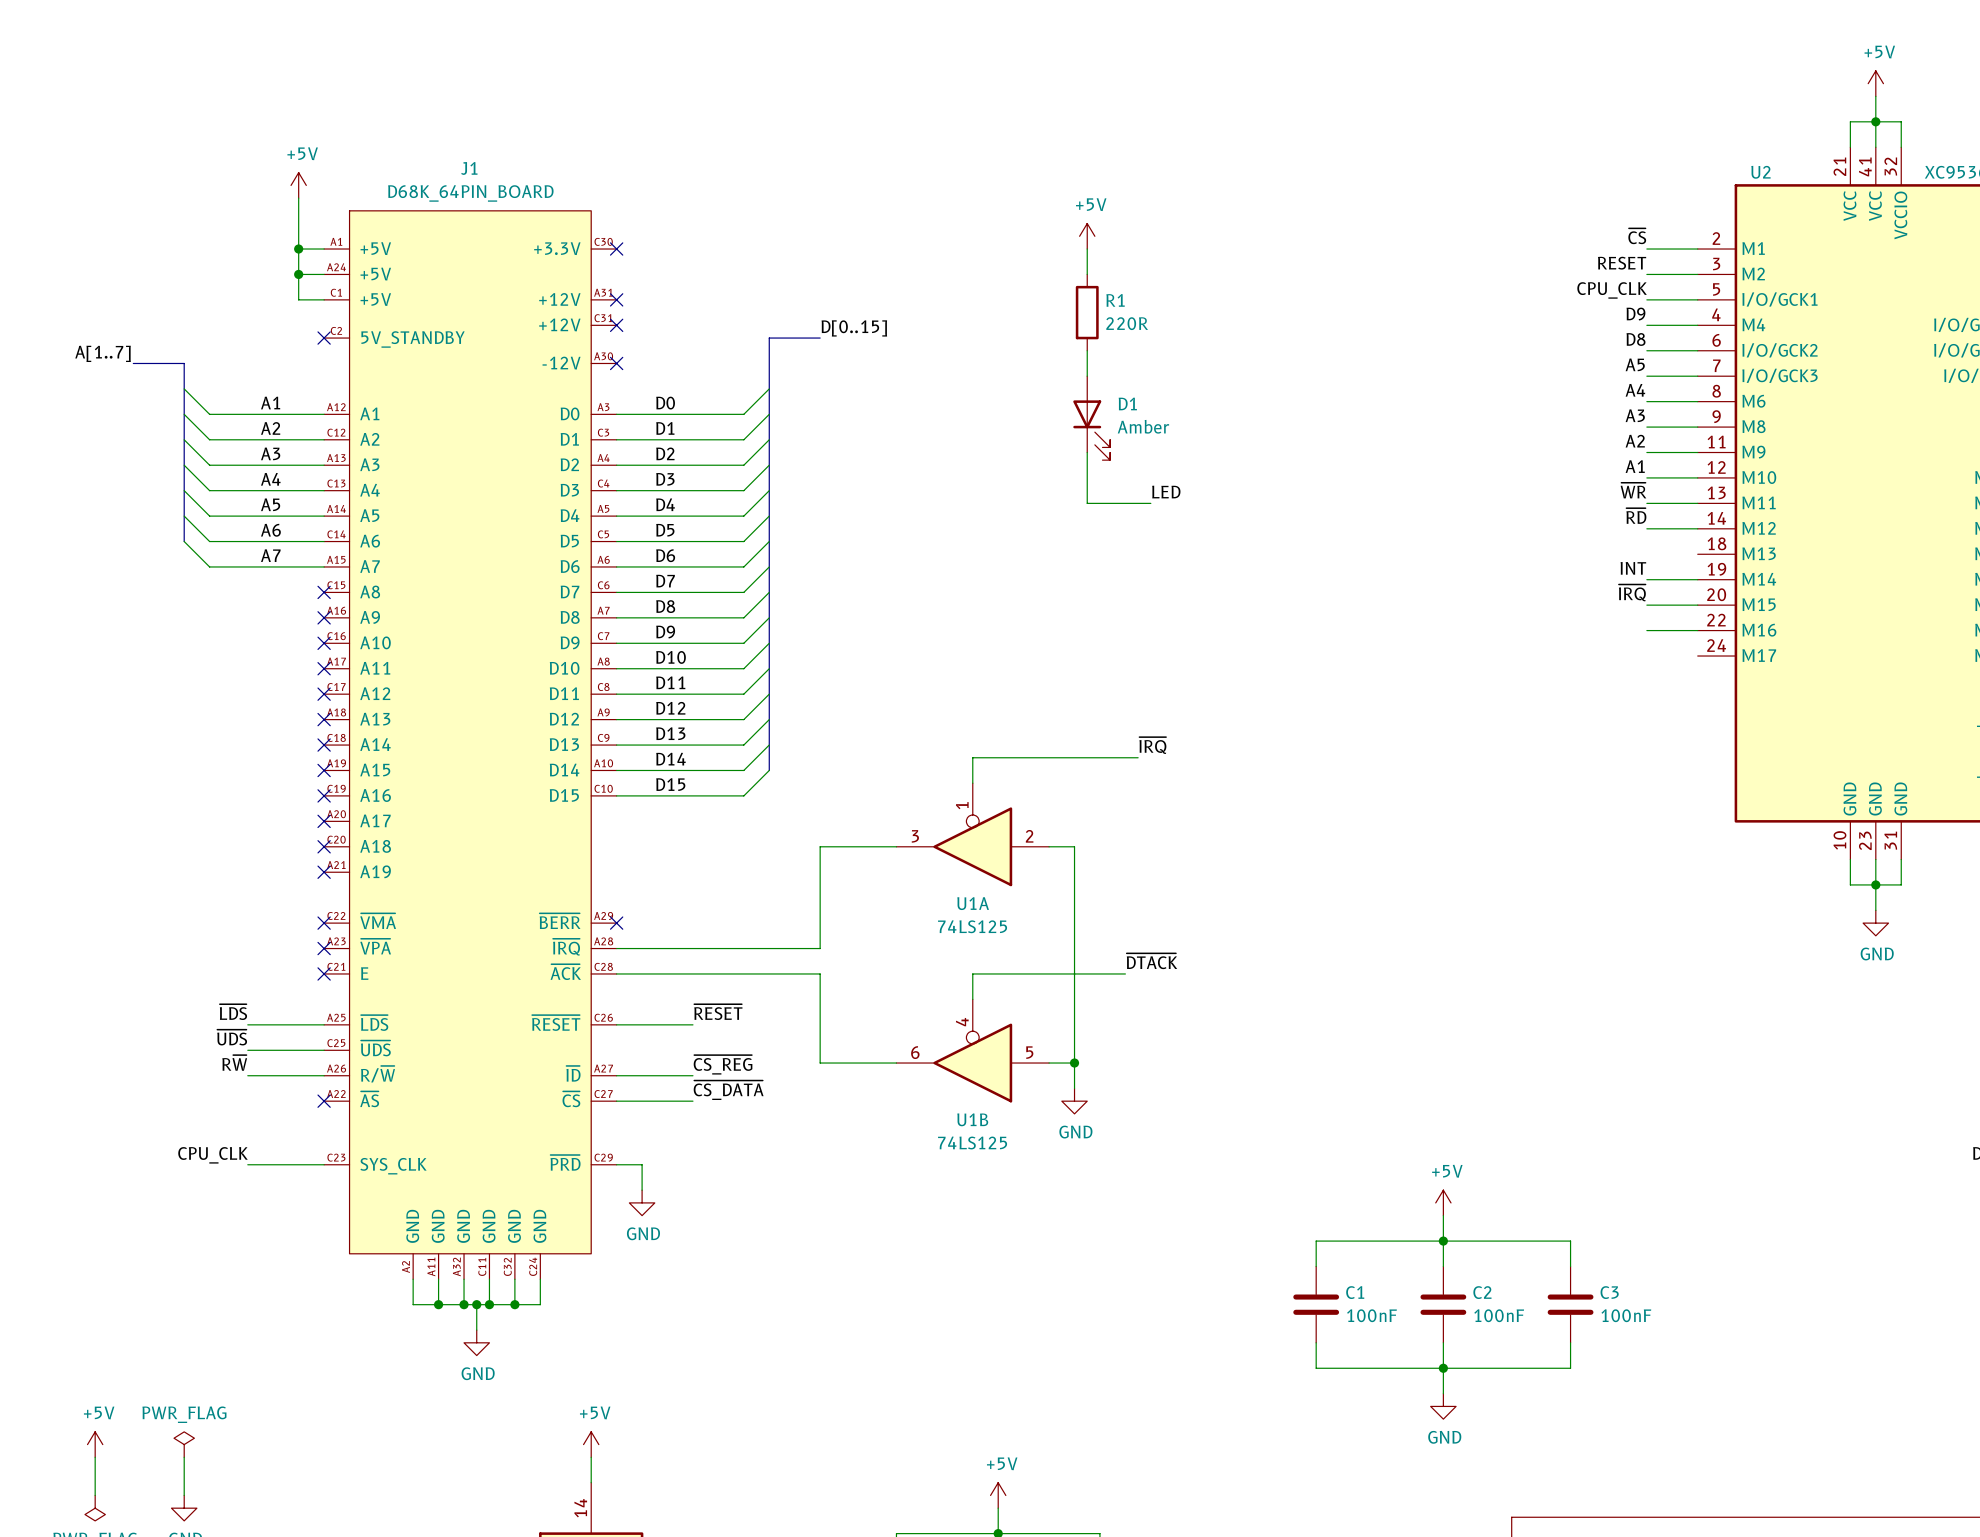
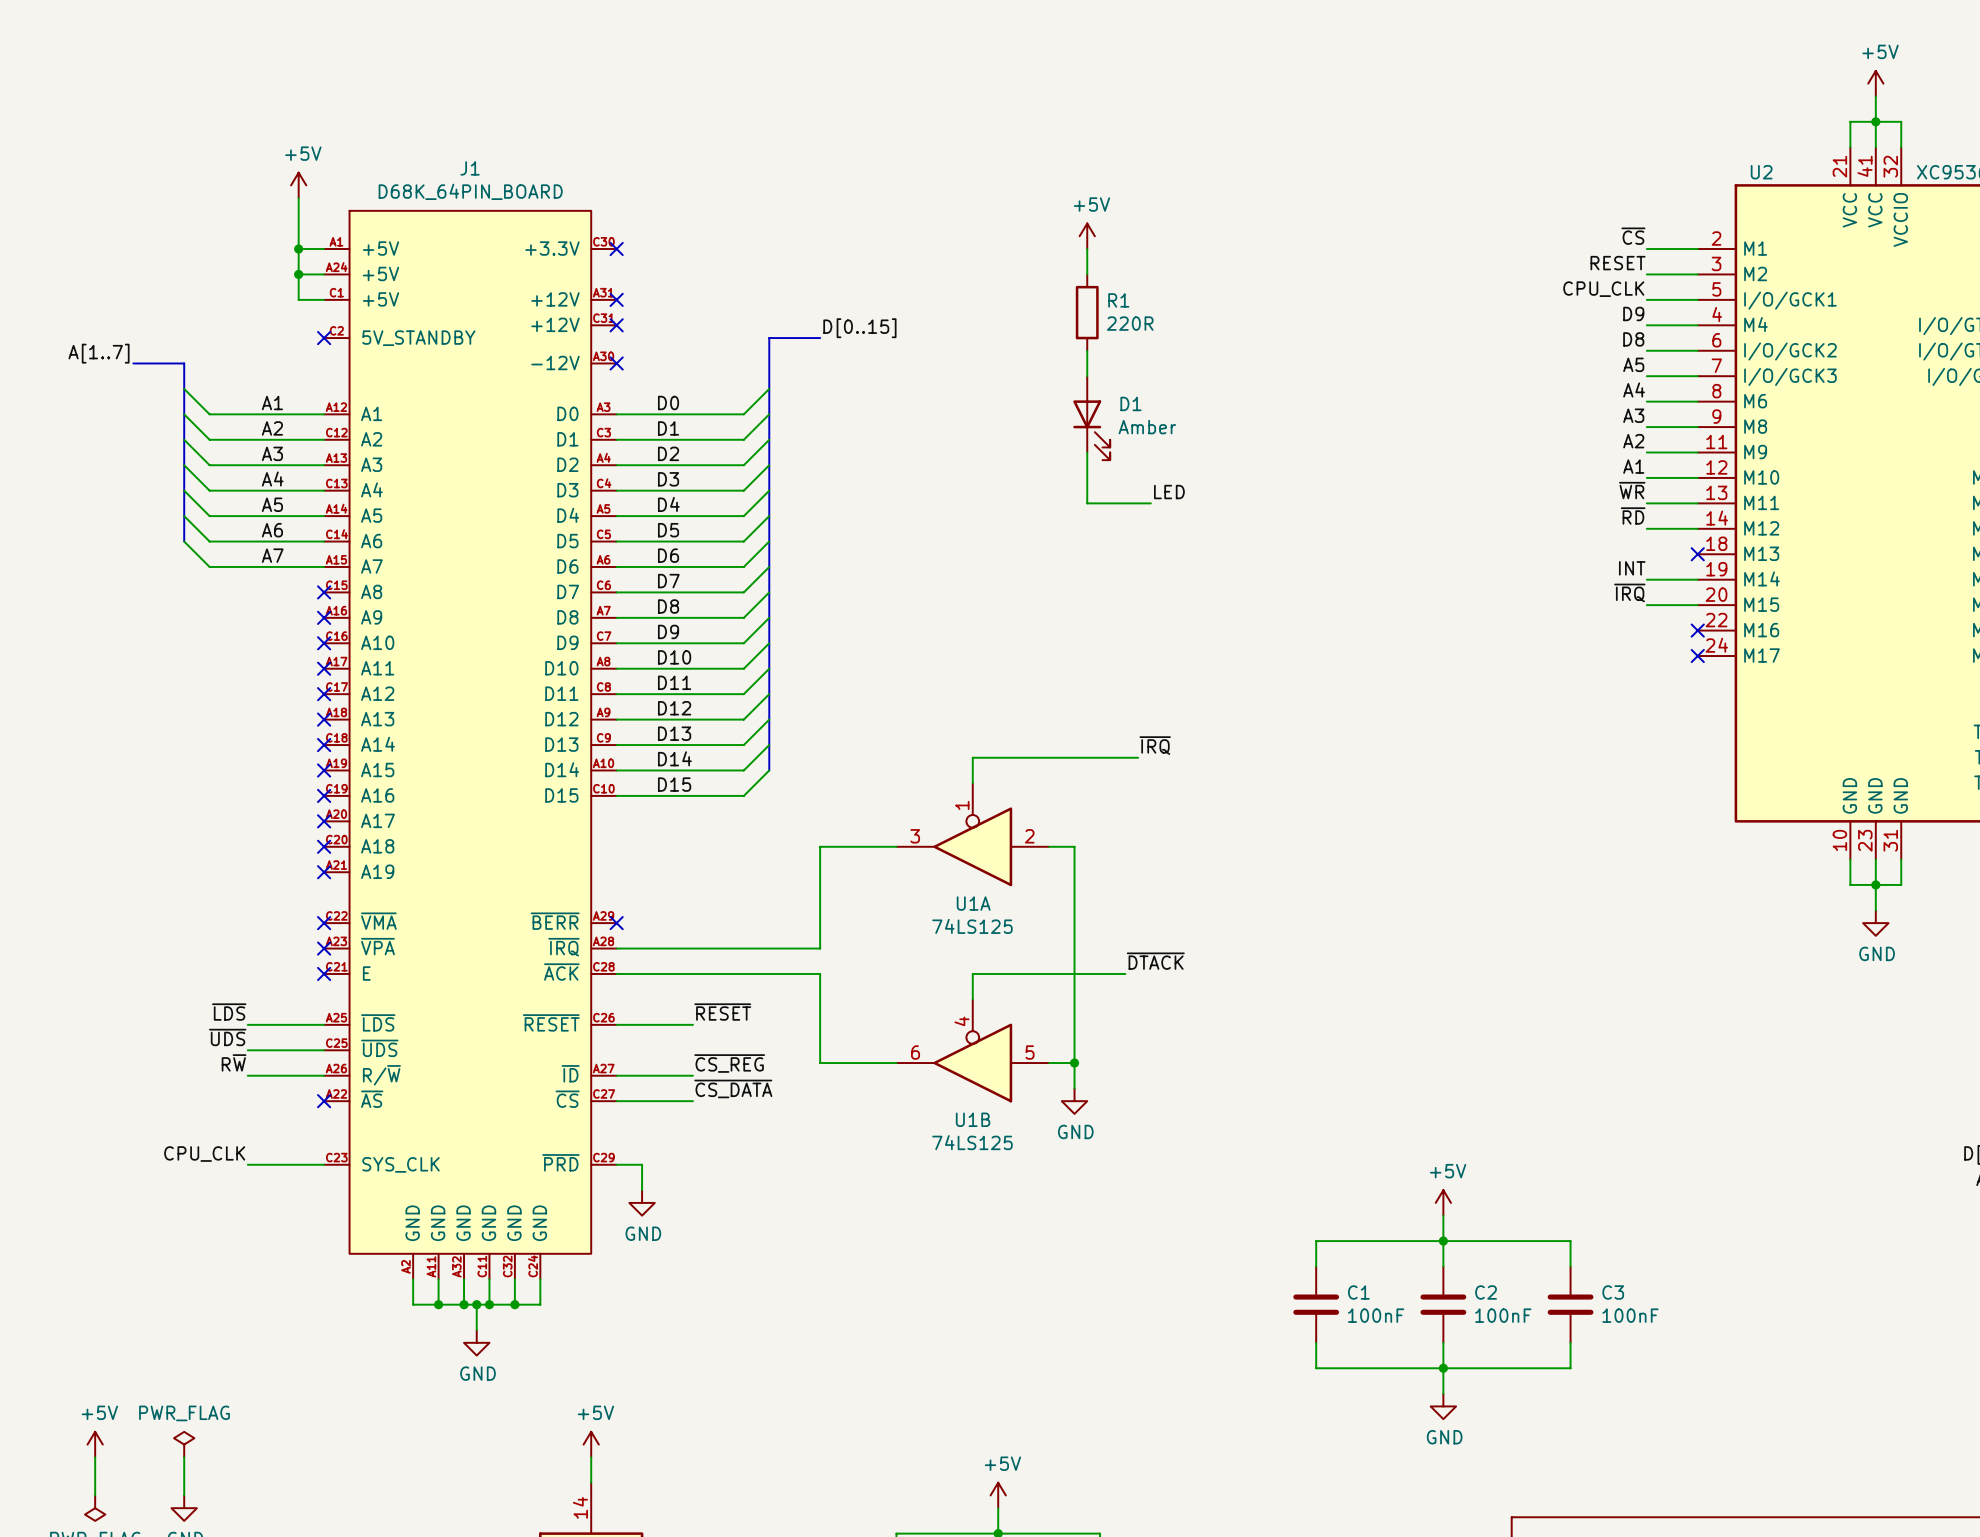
no-connect mark: none -> (1697, 554)
wire: (1646, 630) (1697, 630) -> none
no-connect mark: none -> (1697, 630)
no-connect mark: none -> (1697, 656)

